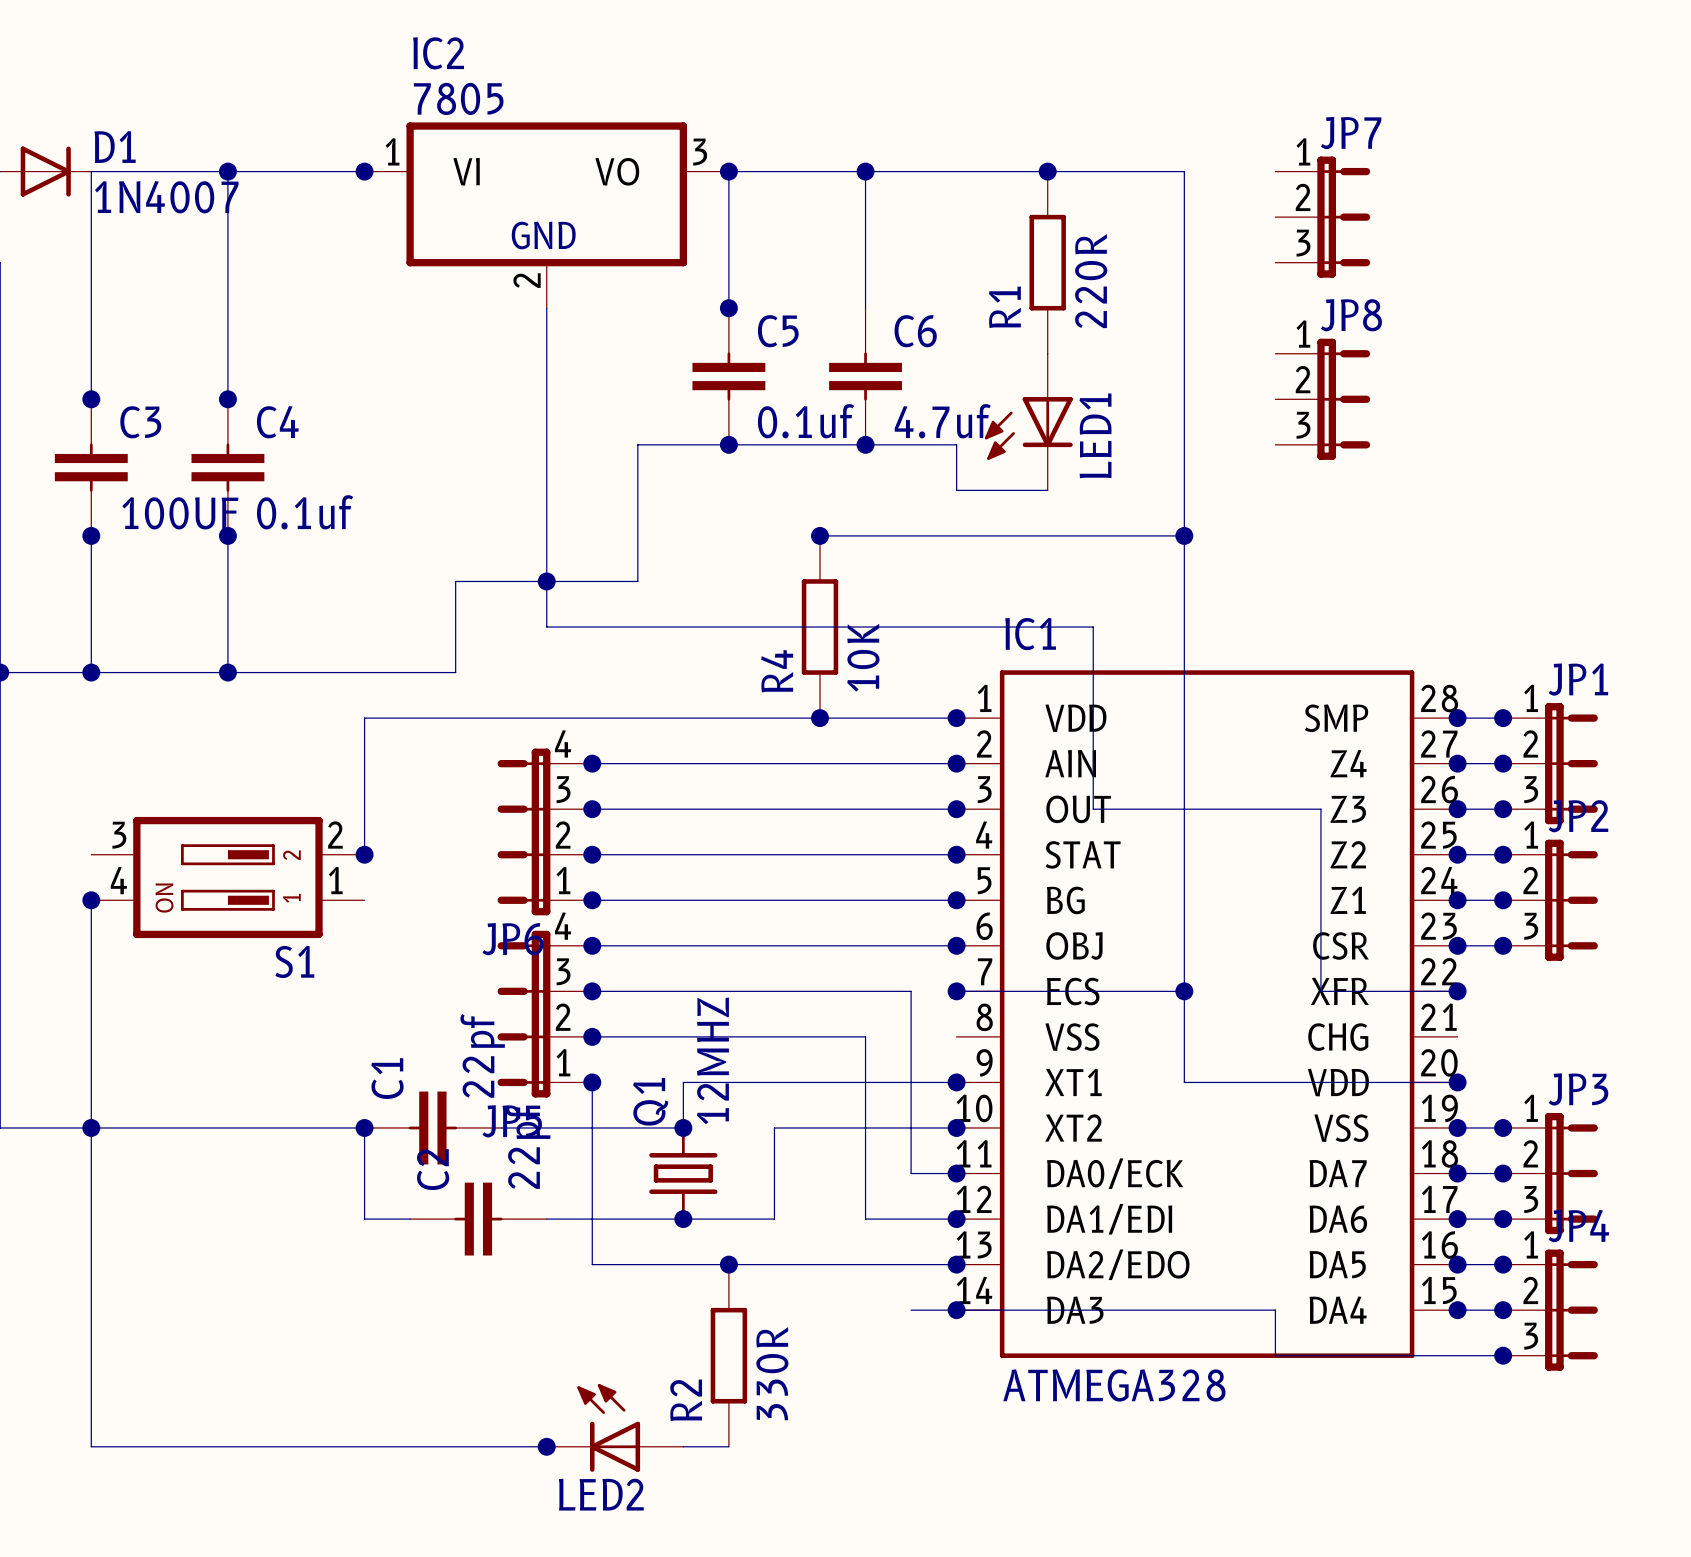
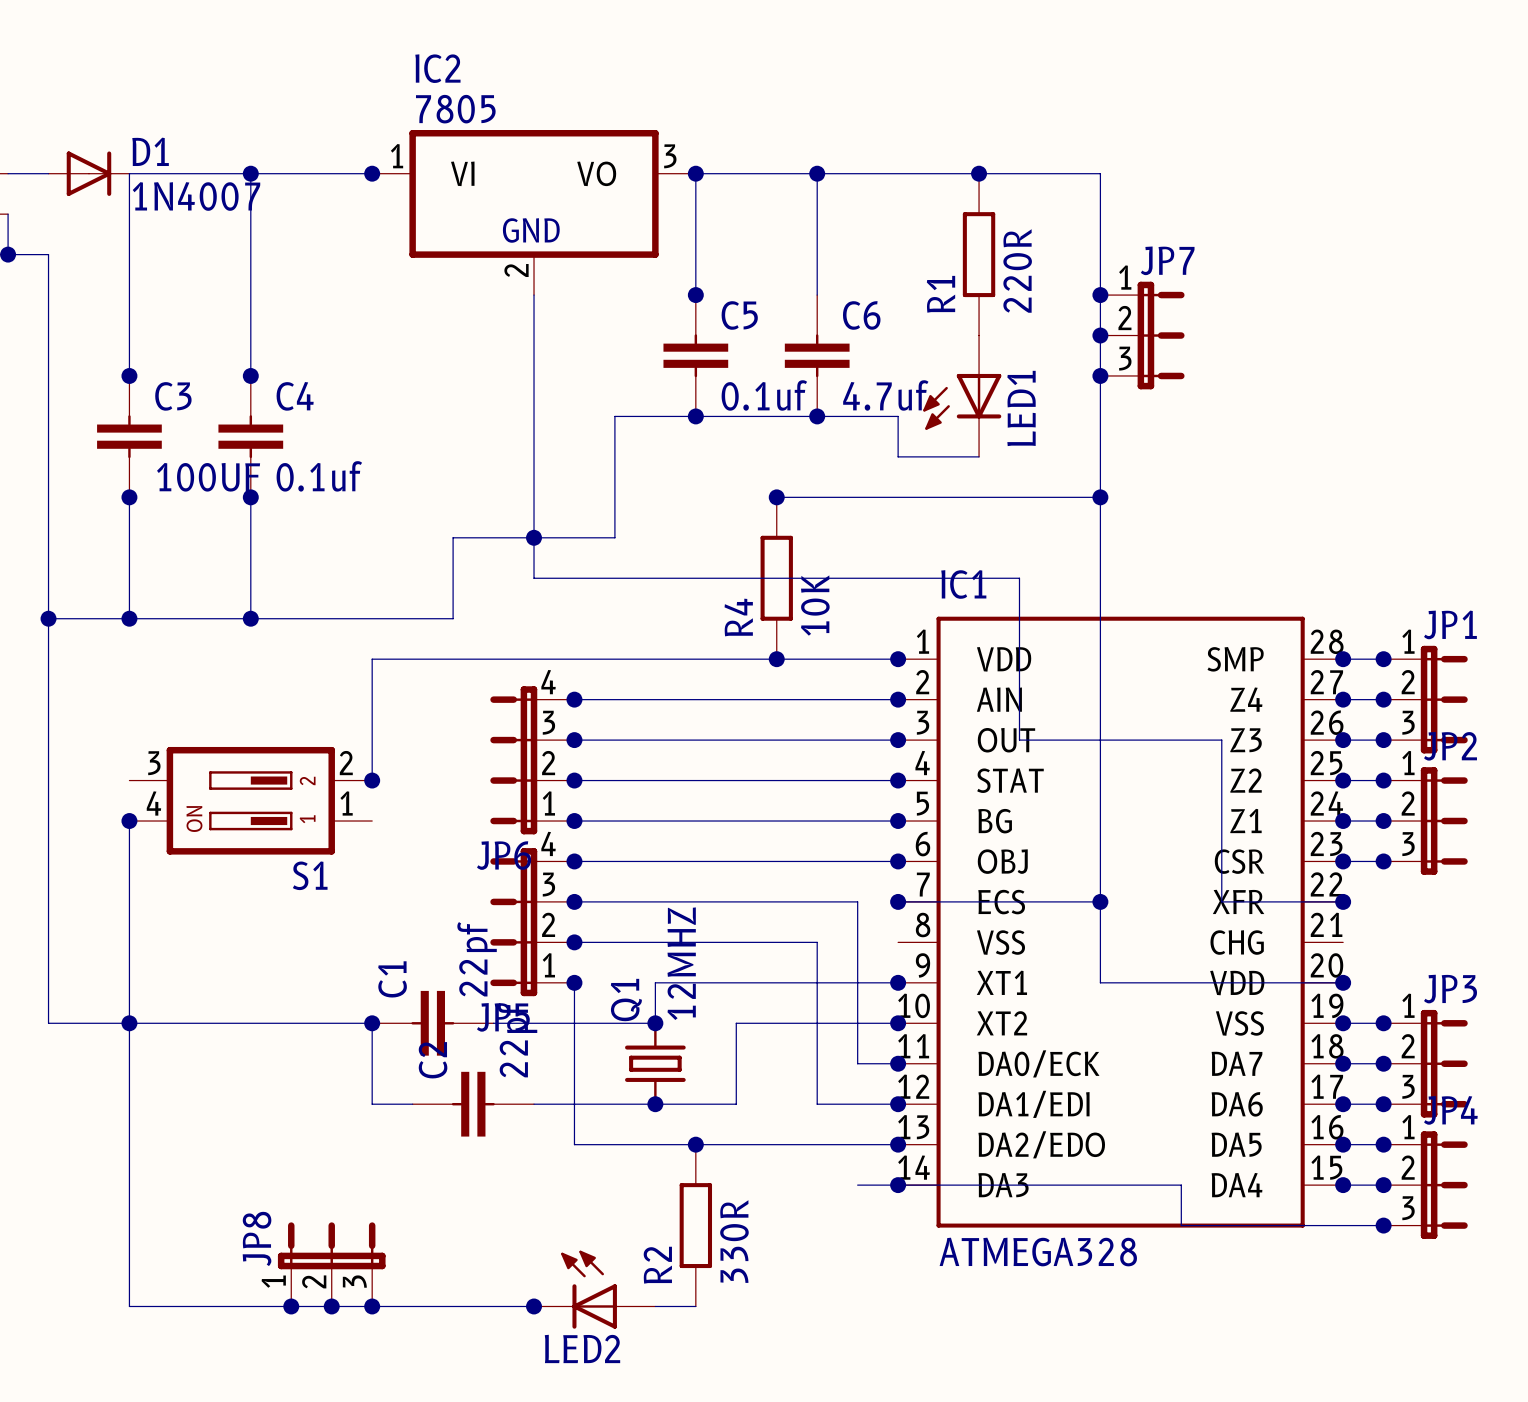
JP7 position: (1322, 217) -> (1142, 335)
junction: none -> (1100, 295)
junction: none -> (1100, 335)
junction: none -> (1100, 375)
JP8 position: (1322, 399) -> (331, 1264)
JP8 rotation: 0° (1343, 399) -> 90° counterclockwise (331, 1245)
junction: none -> (291, 1306)
junction: none -> (331, 1306)
junction: none -> (372, 1306)

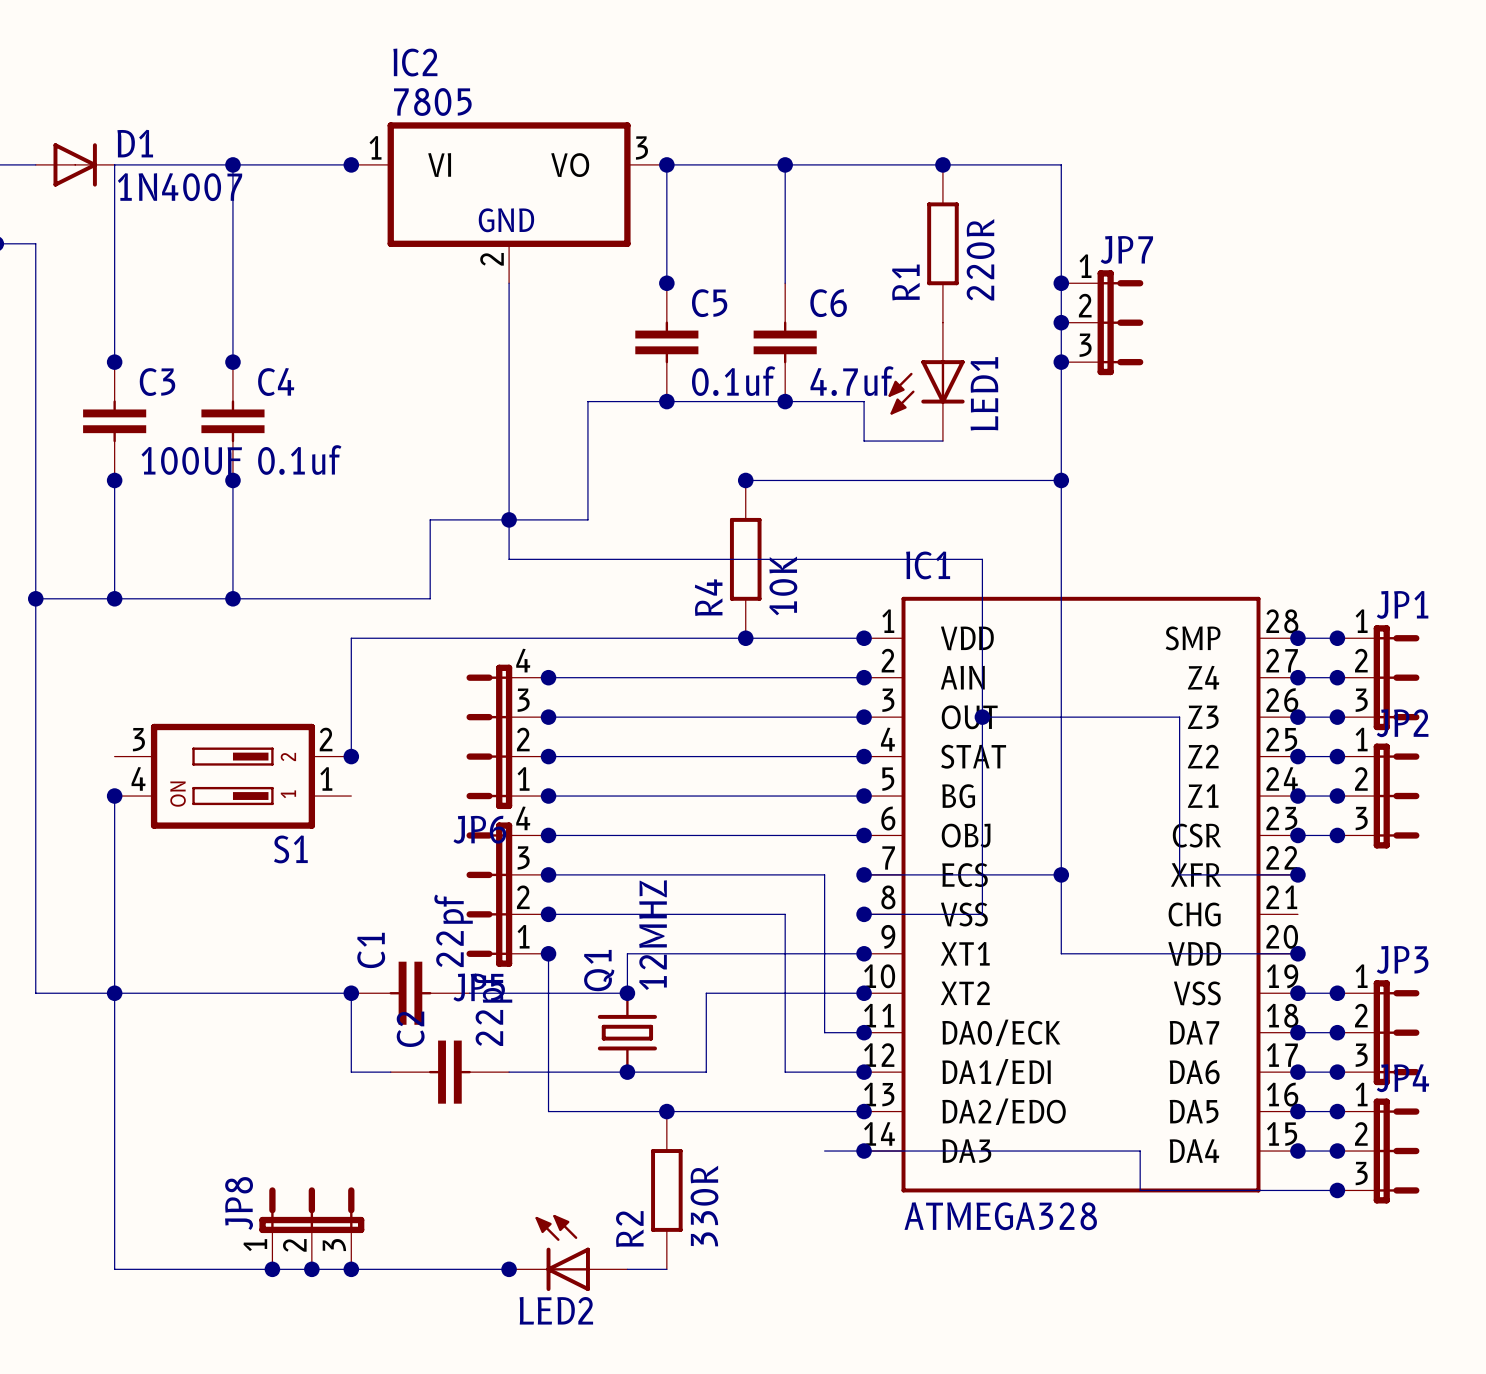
wire: none -> (982, 717) (982, 914) (864, 914)
junction: none -> (982, 717)
junction: none -> (864, 914)

